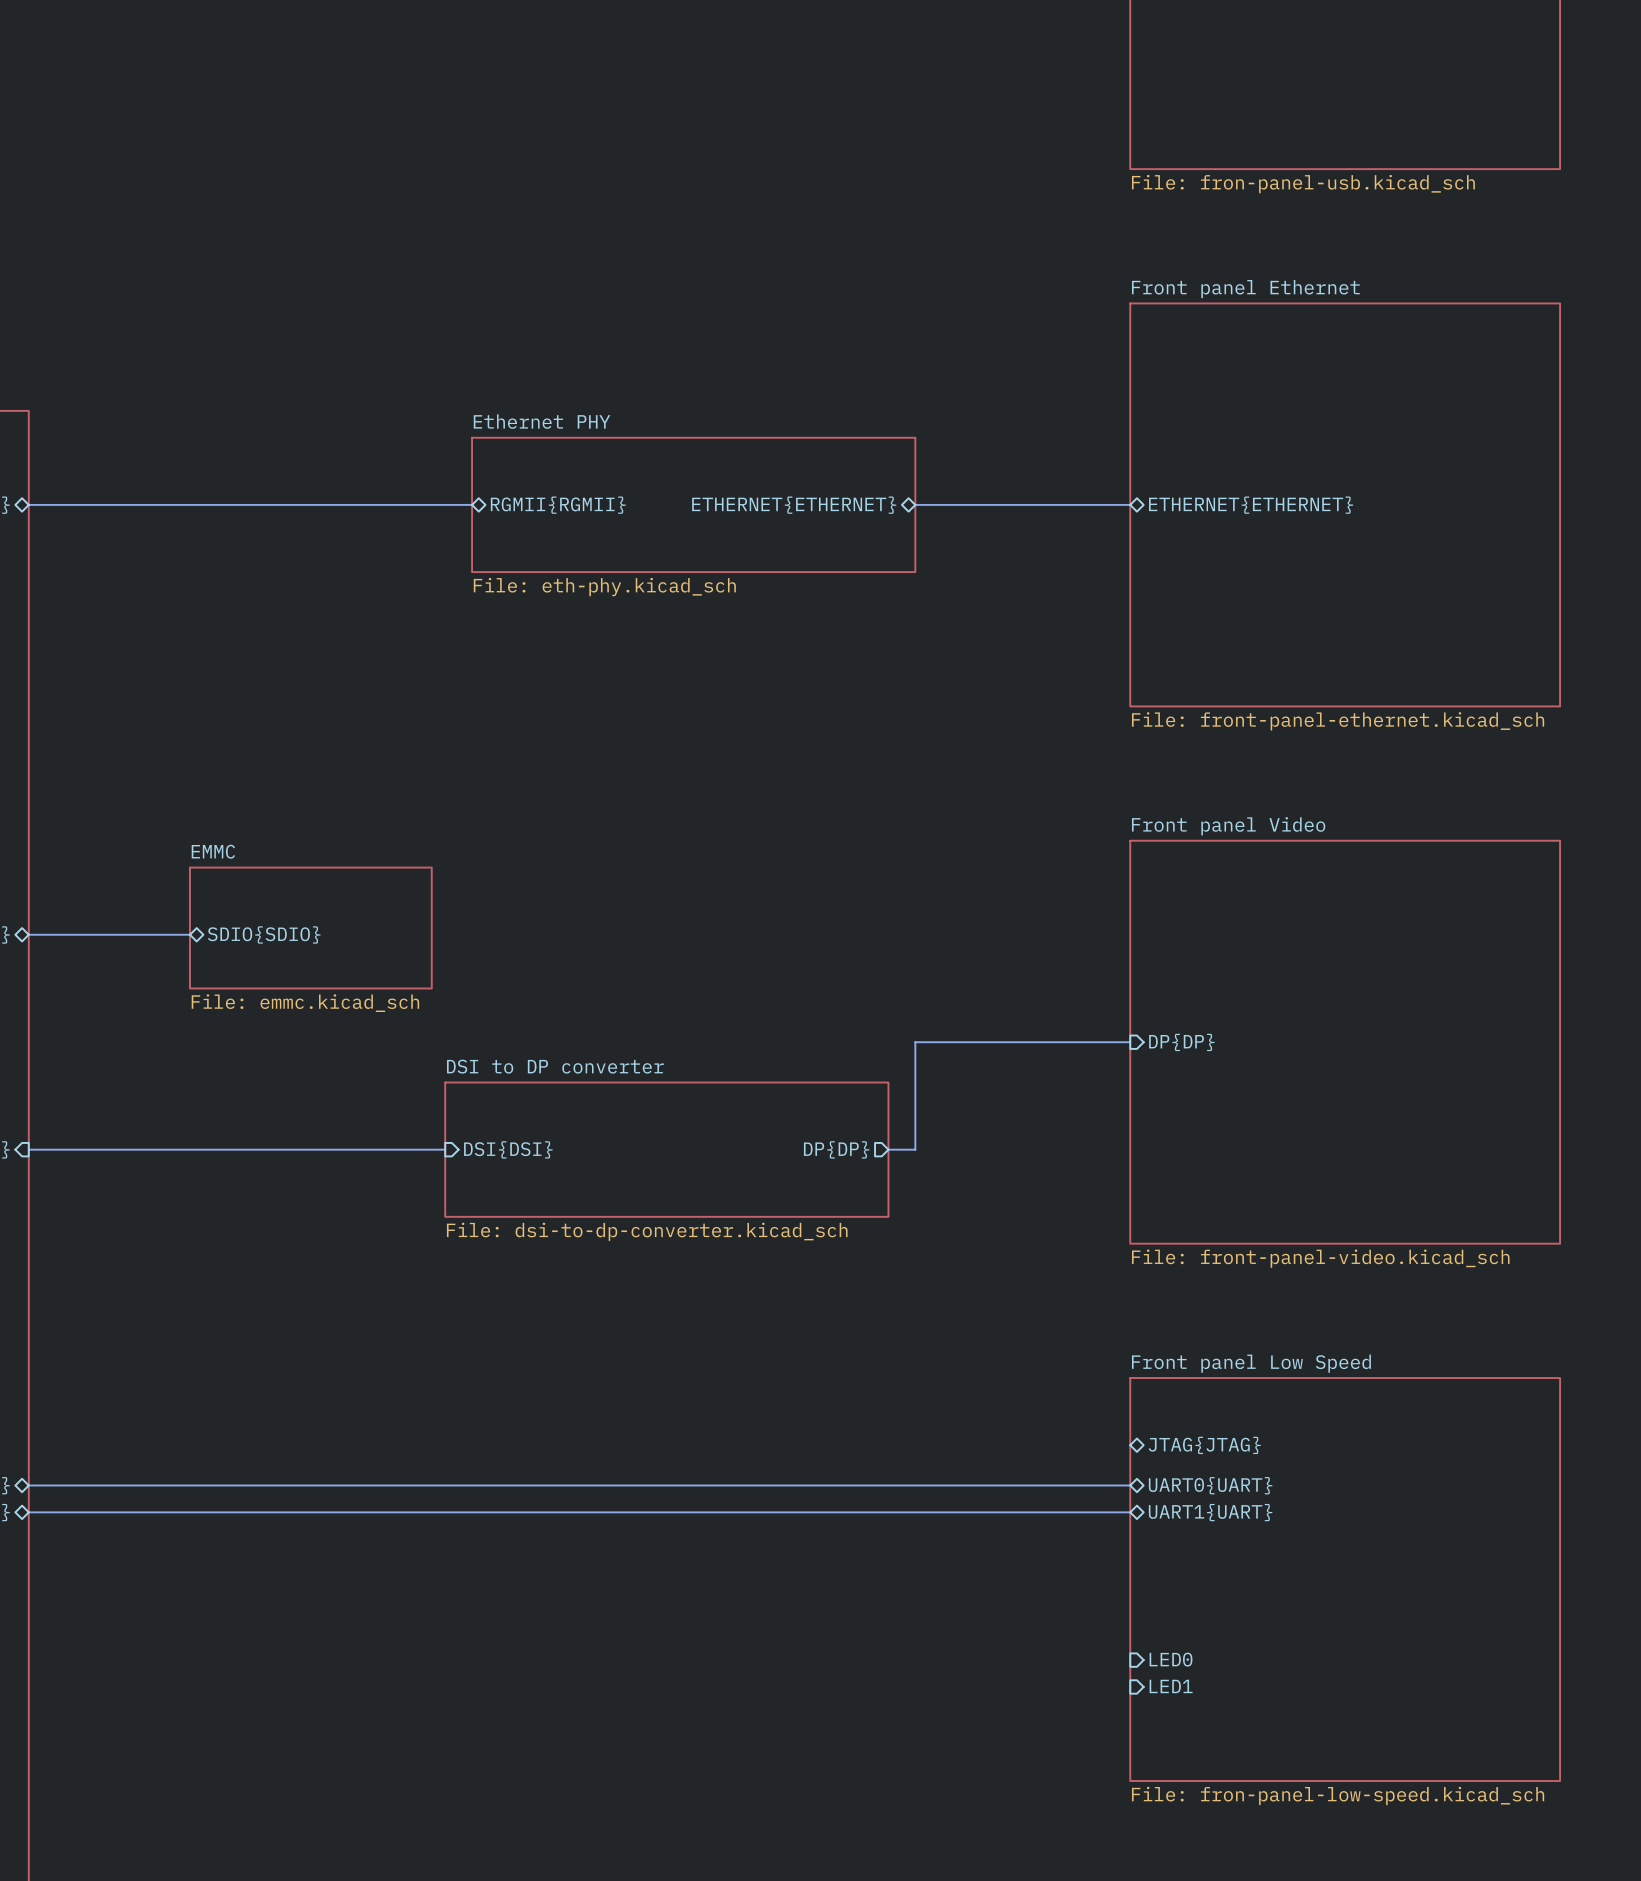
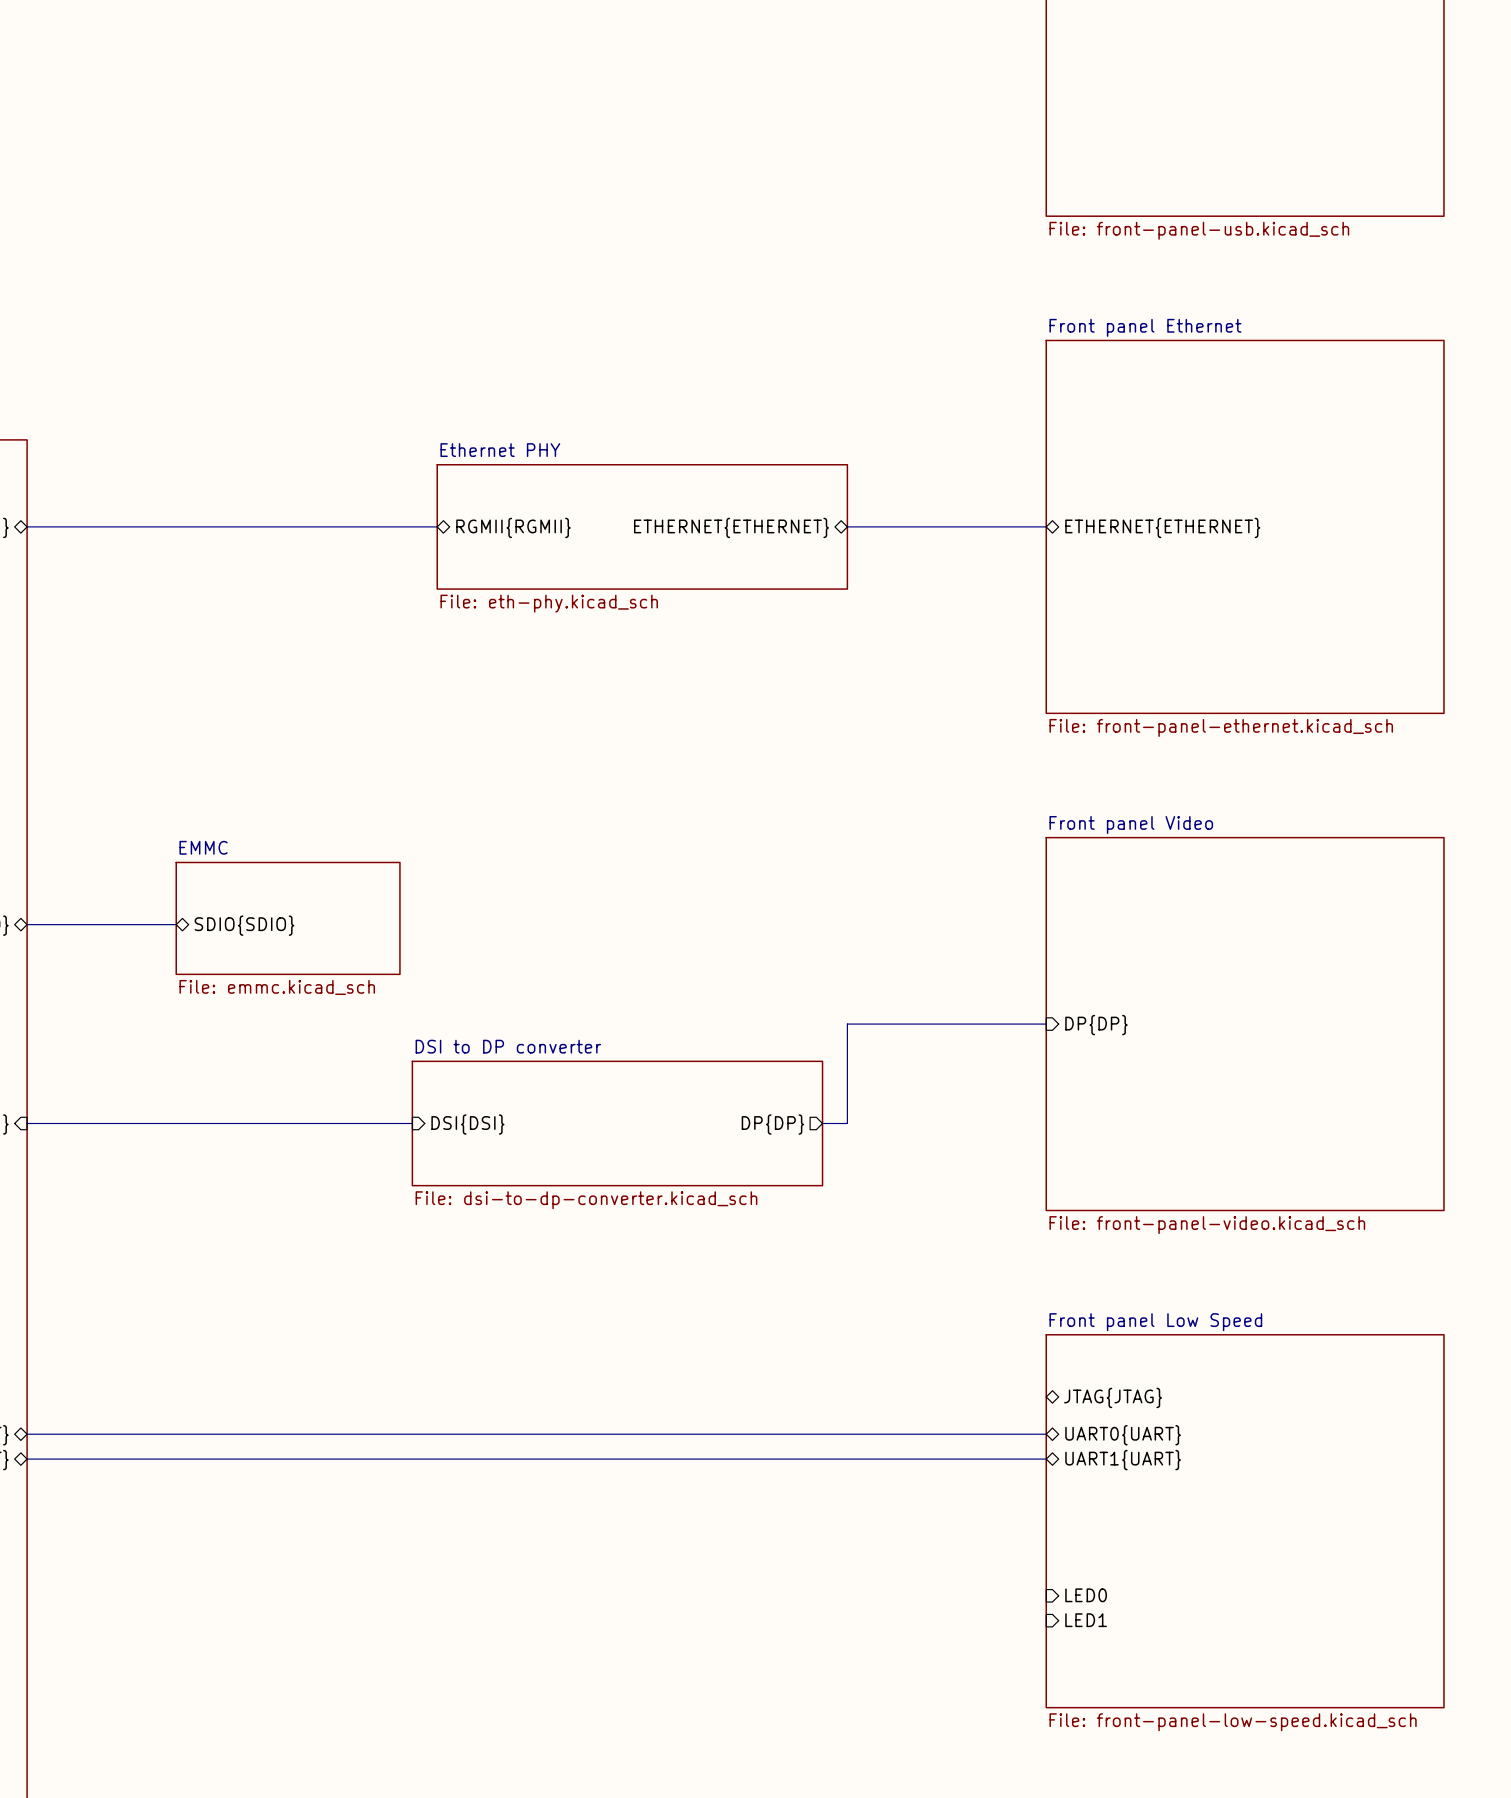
sheet value: File: fron-panel-usb.kicad_sch (1303, 184) -> File: front-panel-usb.kicad_sch (1199, 230)
sheet Front panel Low Speed value: File: fron-panel-low-speed.kicad_sch (1338, 1795) -> File: front-panel-low-speed.kicad_sch (1233, 1722)

